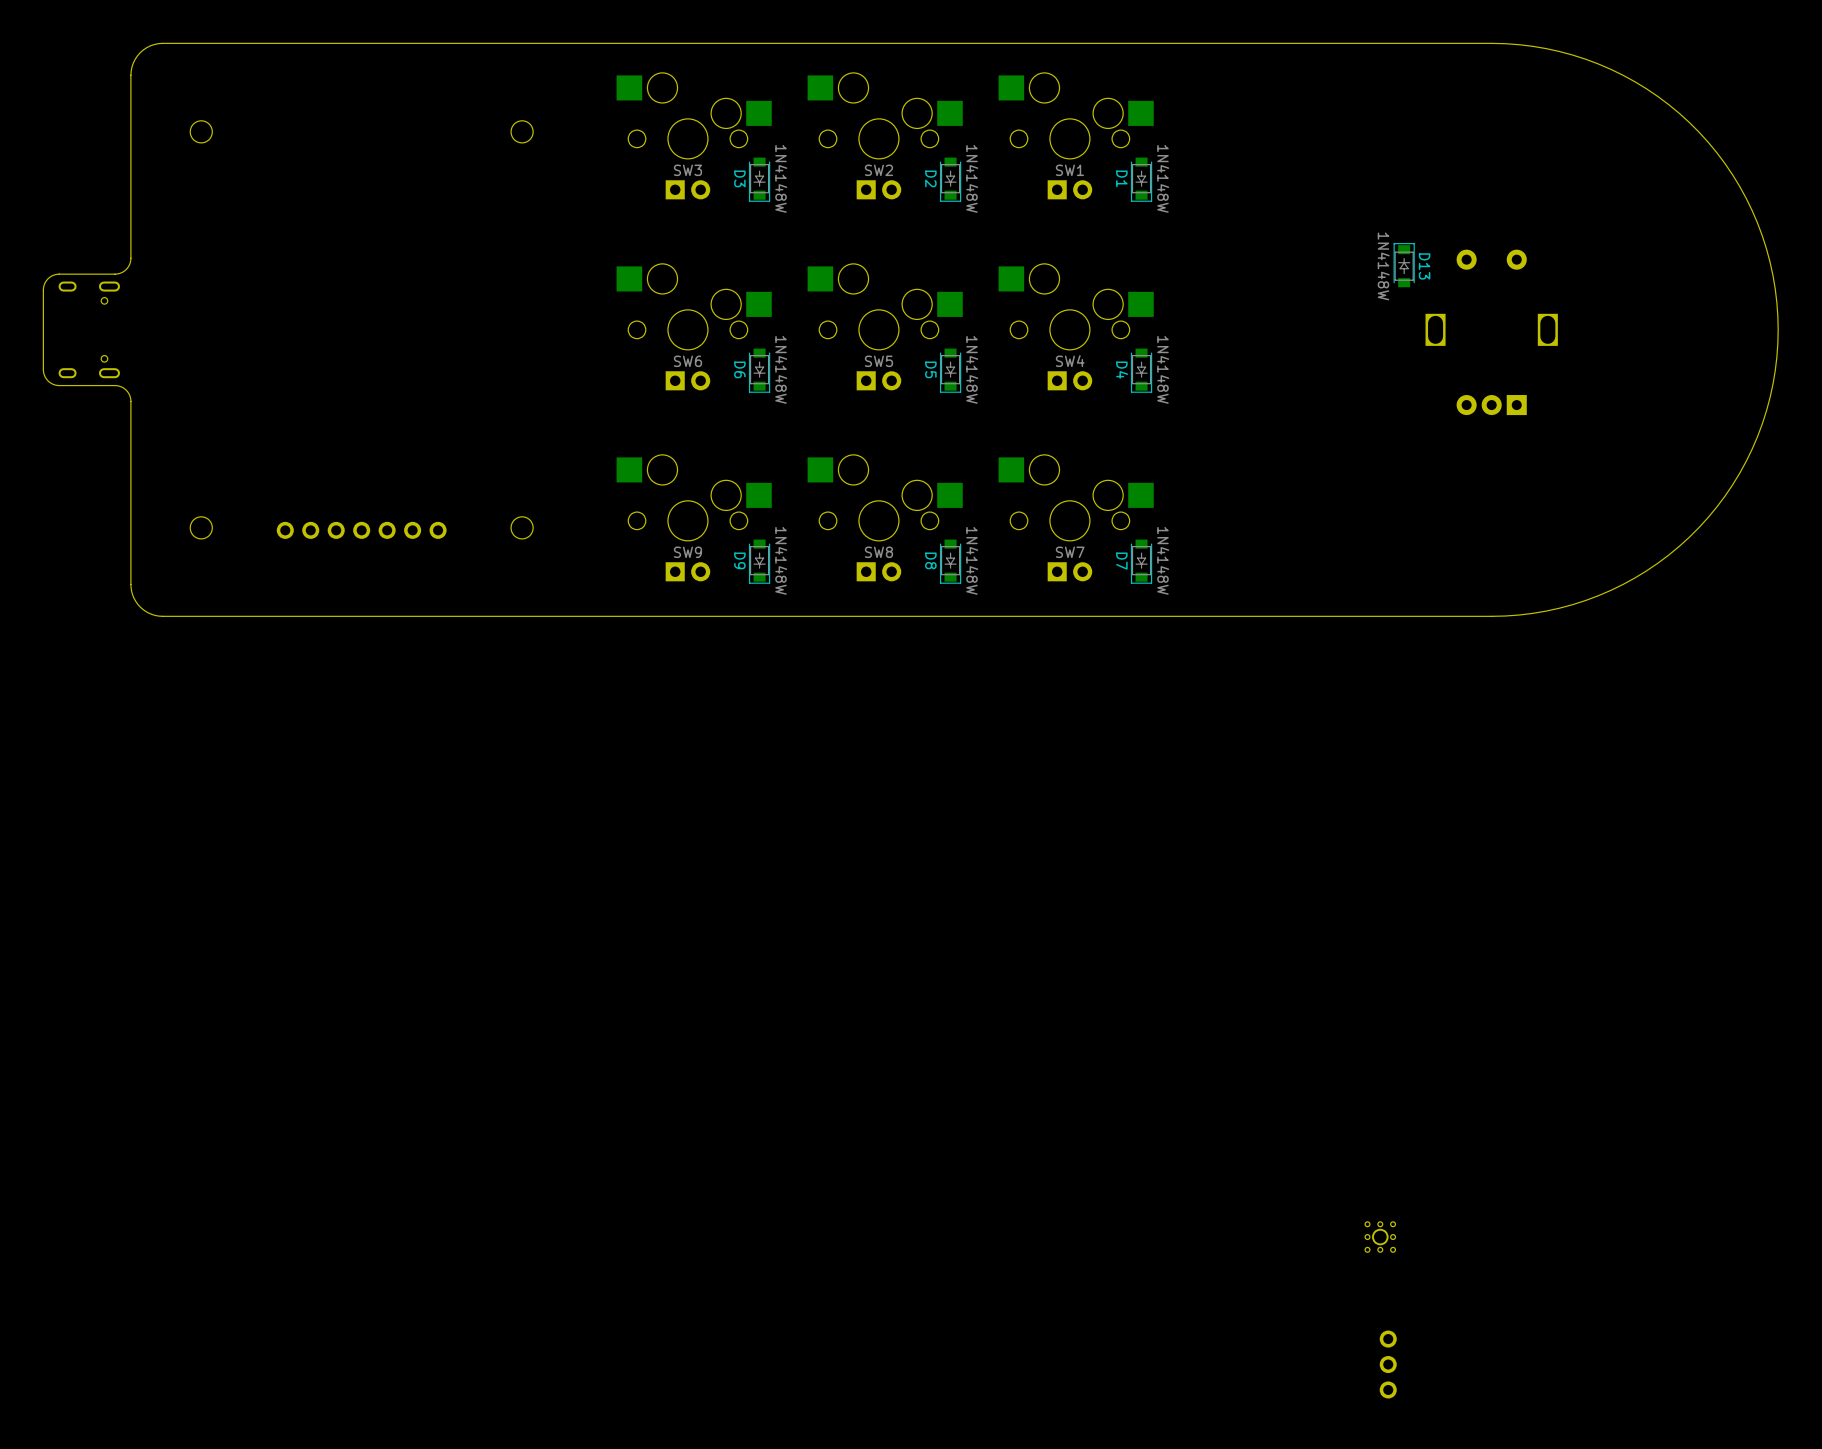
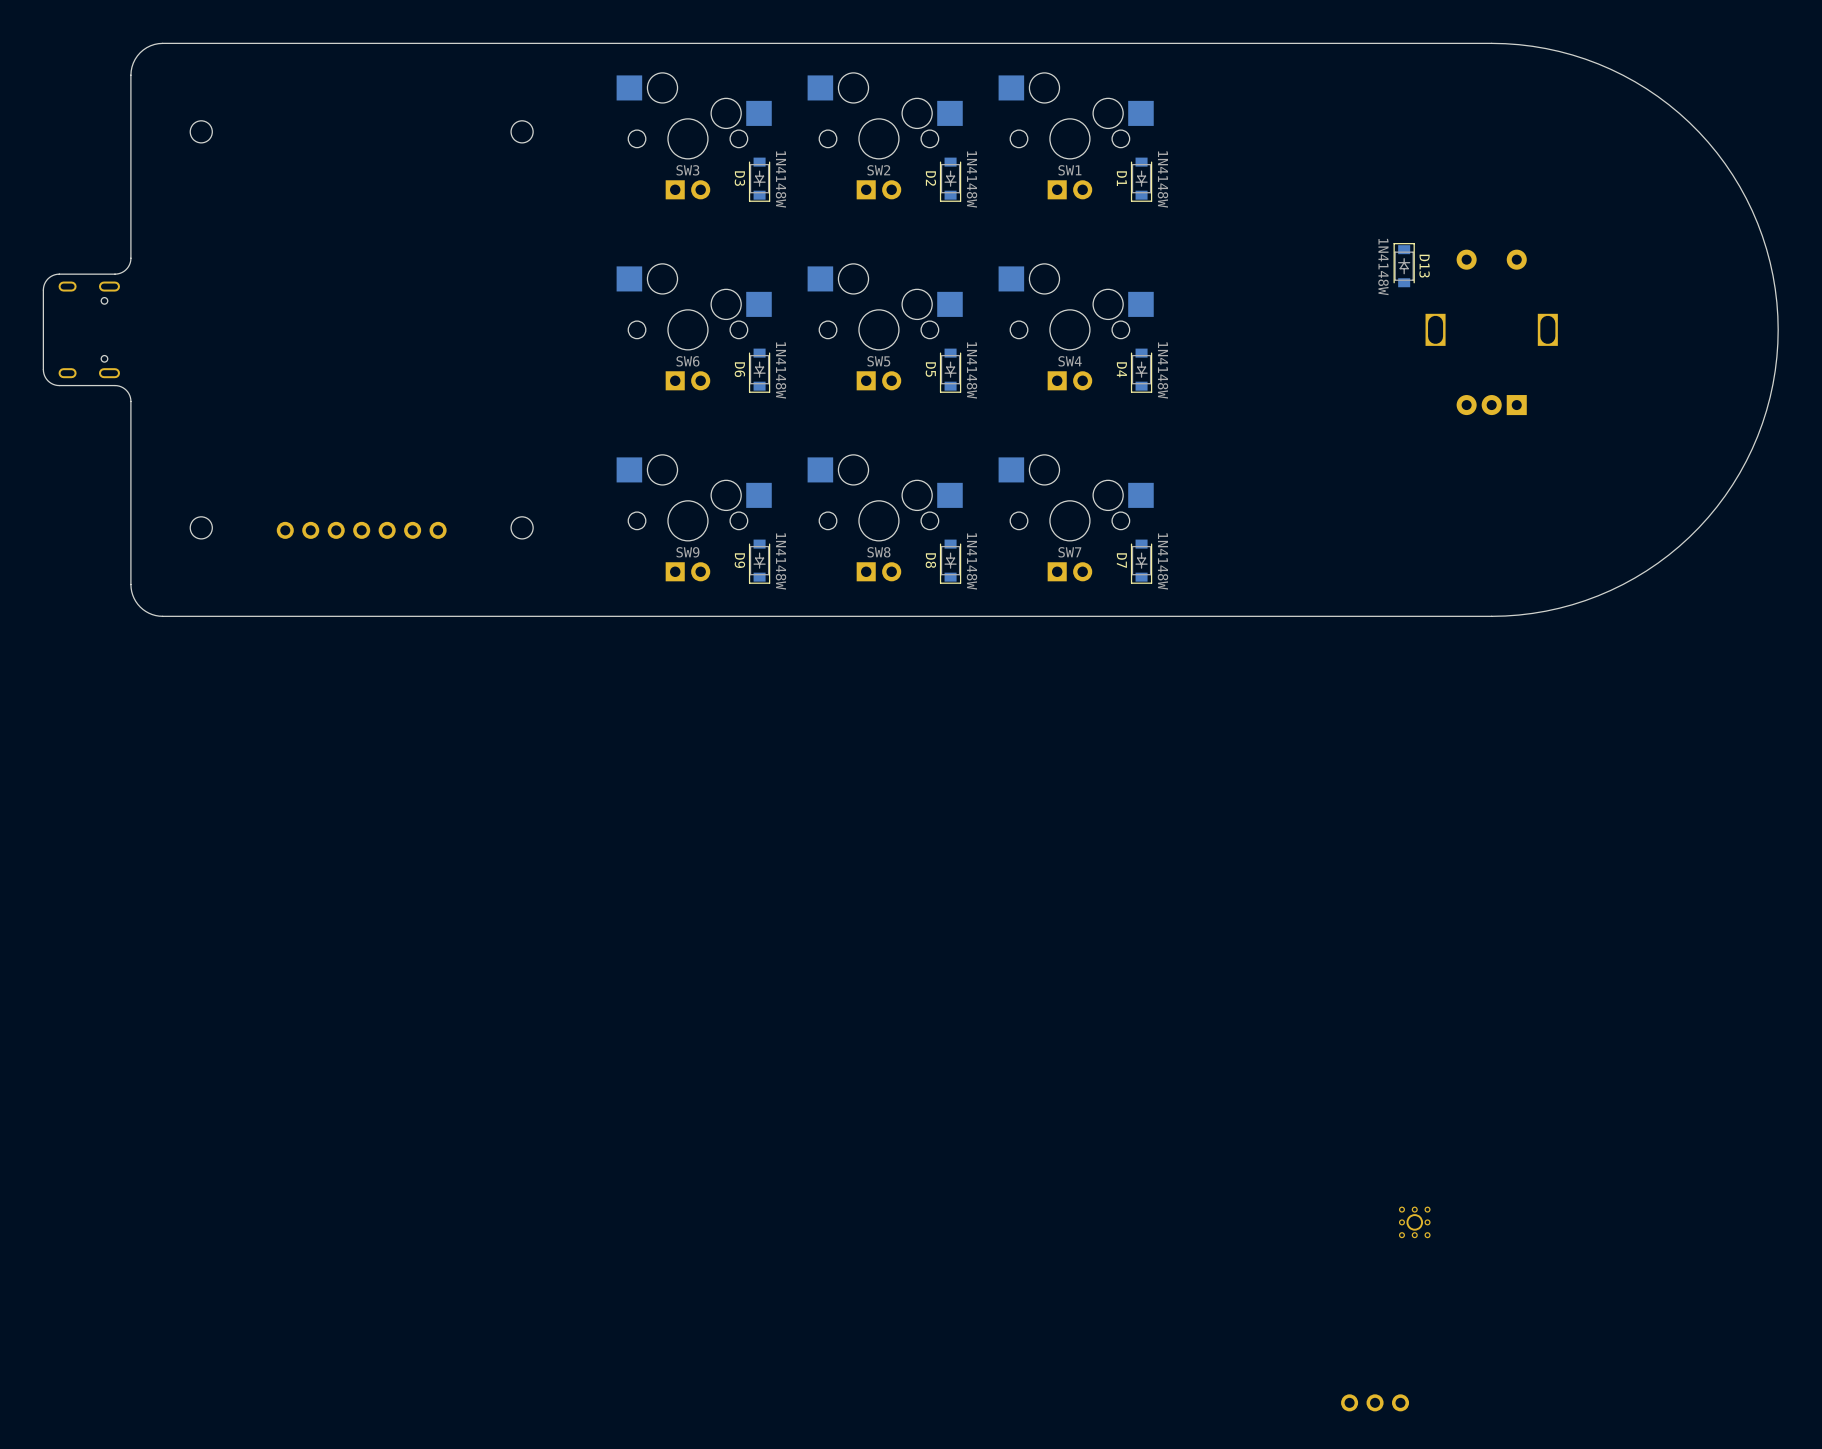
part position: (1380, 1237) -> (1414, 1222)
part rotation: 0° (1388, 1364) -> 90° clockwise (1375, 1402)

